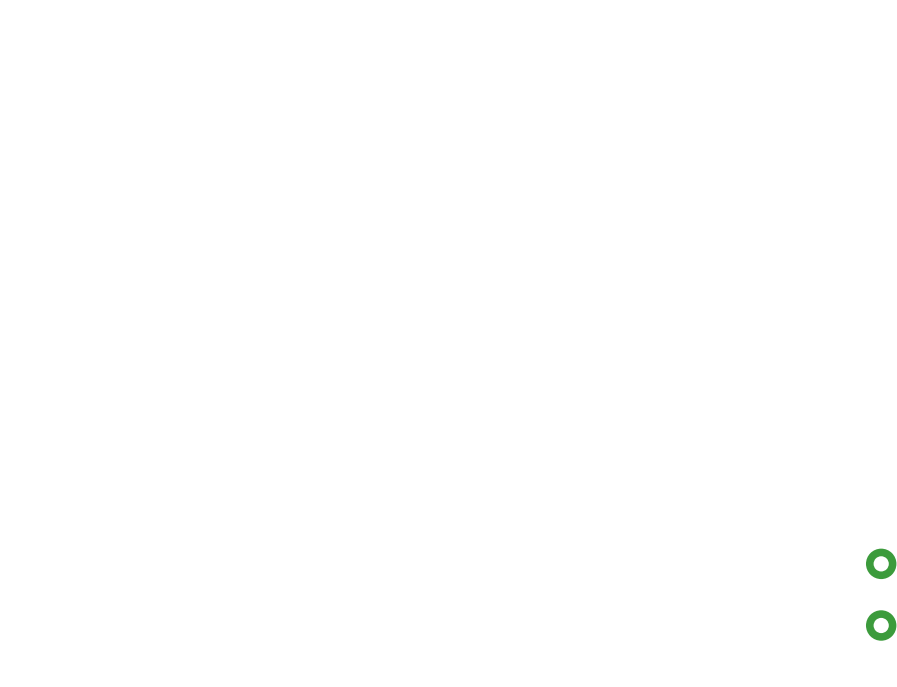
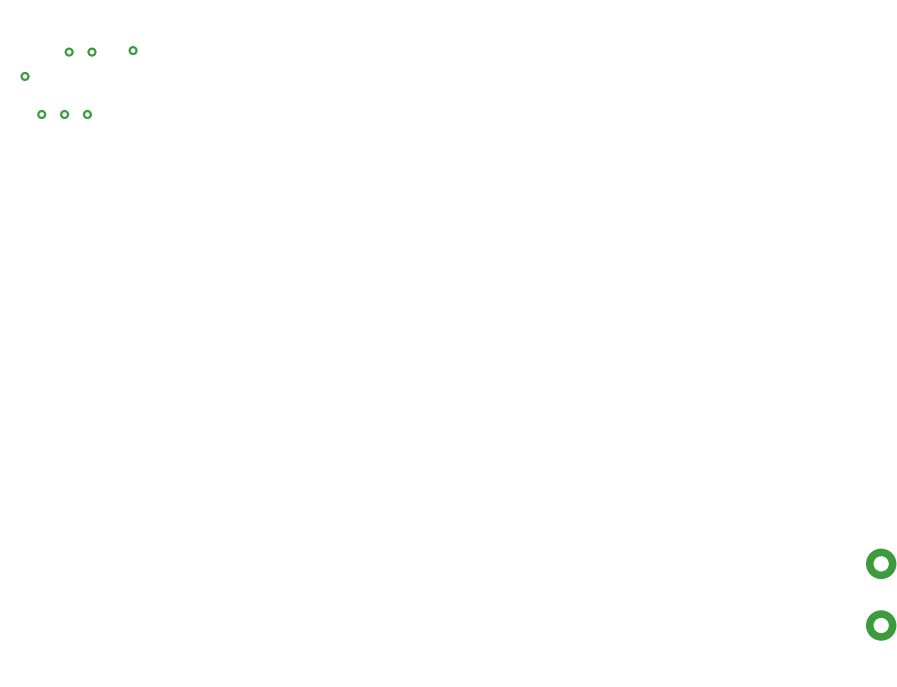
via: none -> (133, 50)
via: none -> (69, 52)
via: none -> (91, 52)
via: none -> (25, 76)
via: none -> (41, 114)
via: none -> (64, 114)
via: none -> (87, 114)

